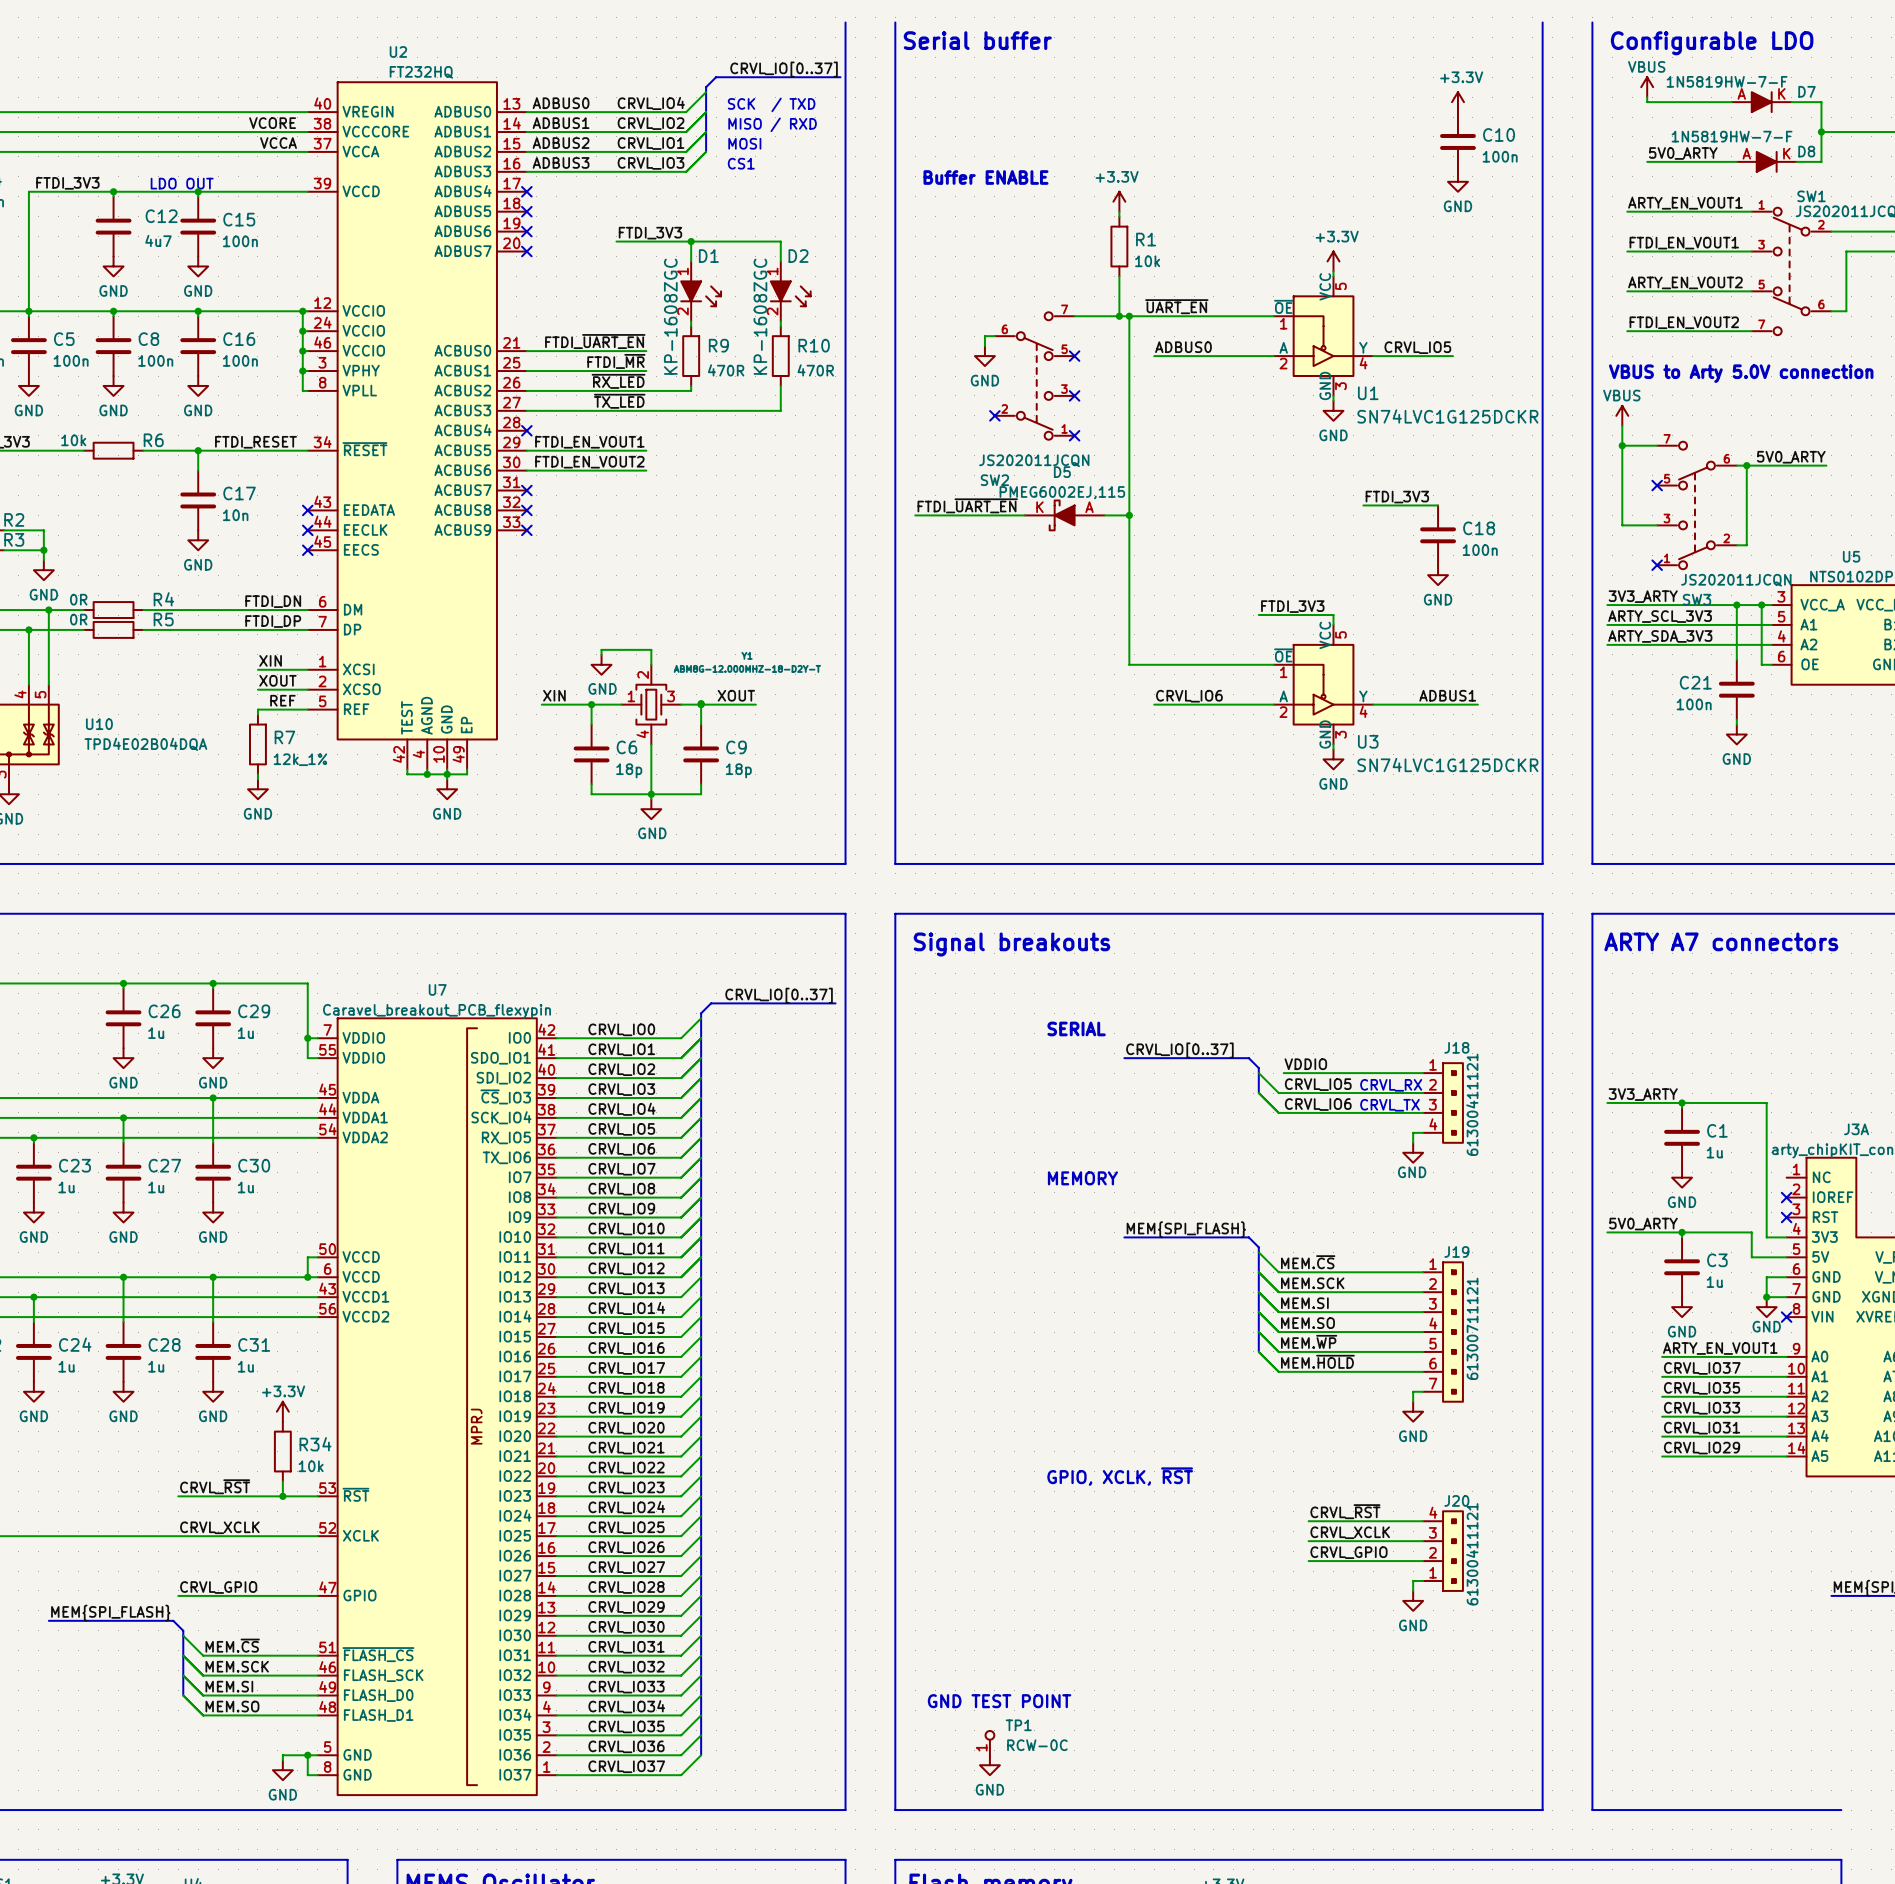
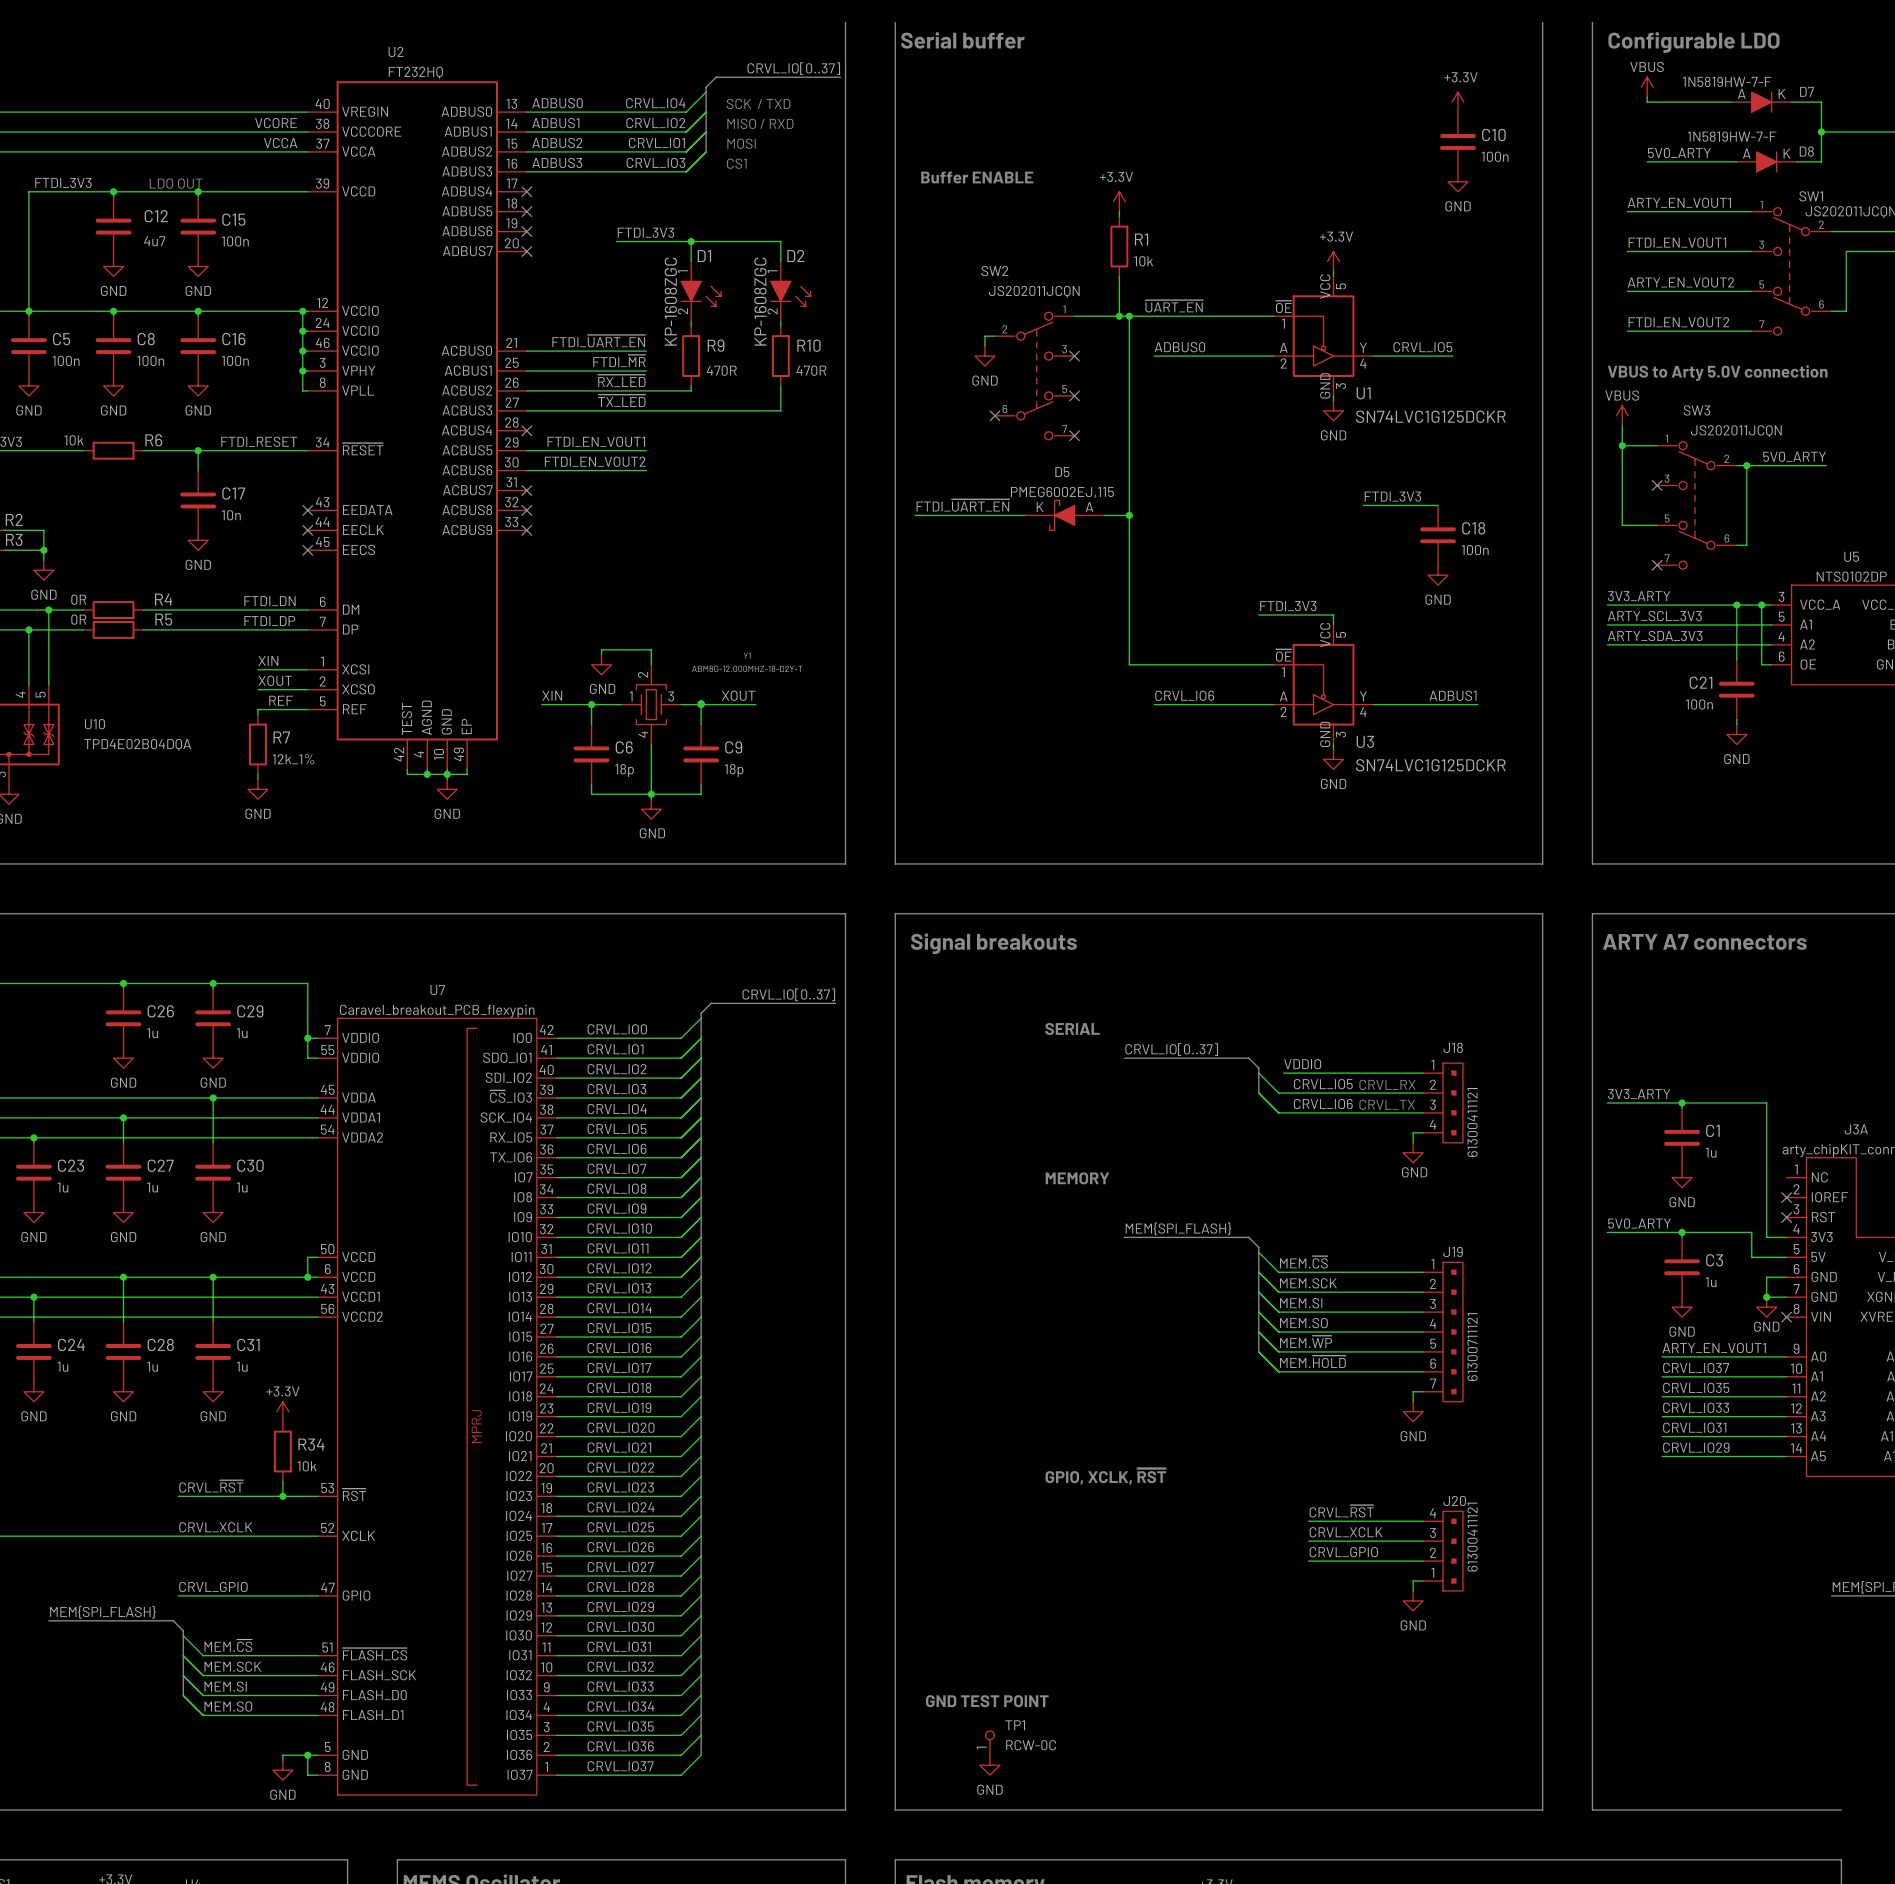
SW2 flip: as is (1034, 376) -> up-down (1034, 376)
SW3 flip: as is (1696, 505) -> up-down (1696, 505)

